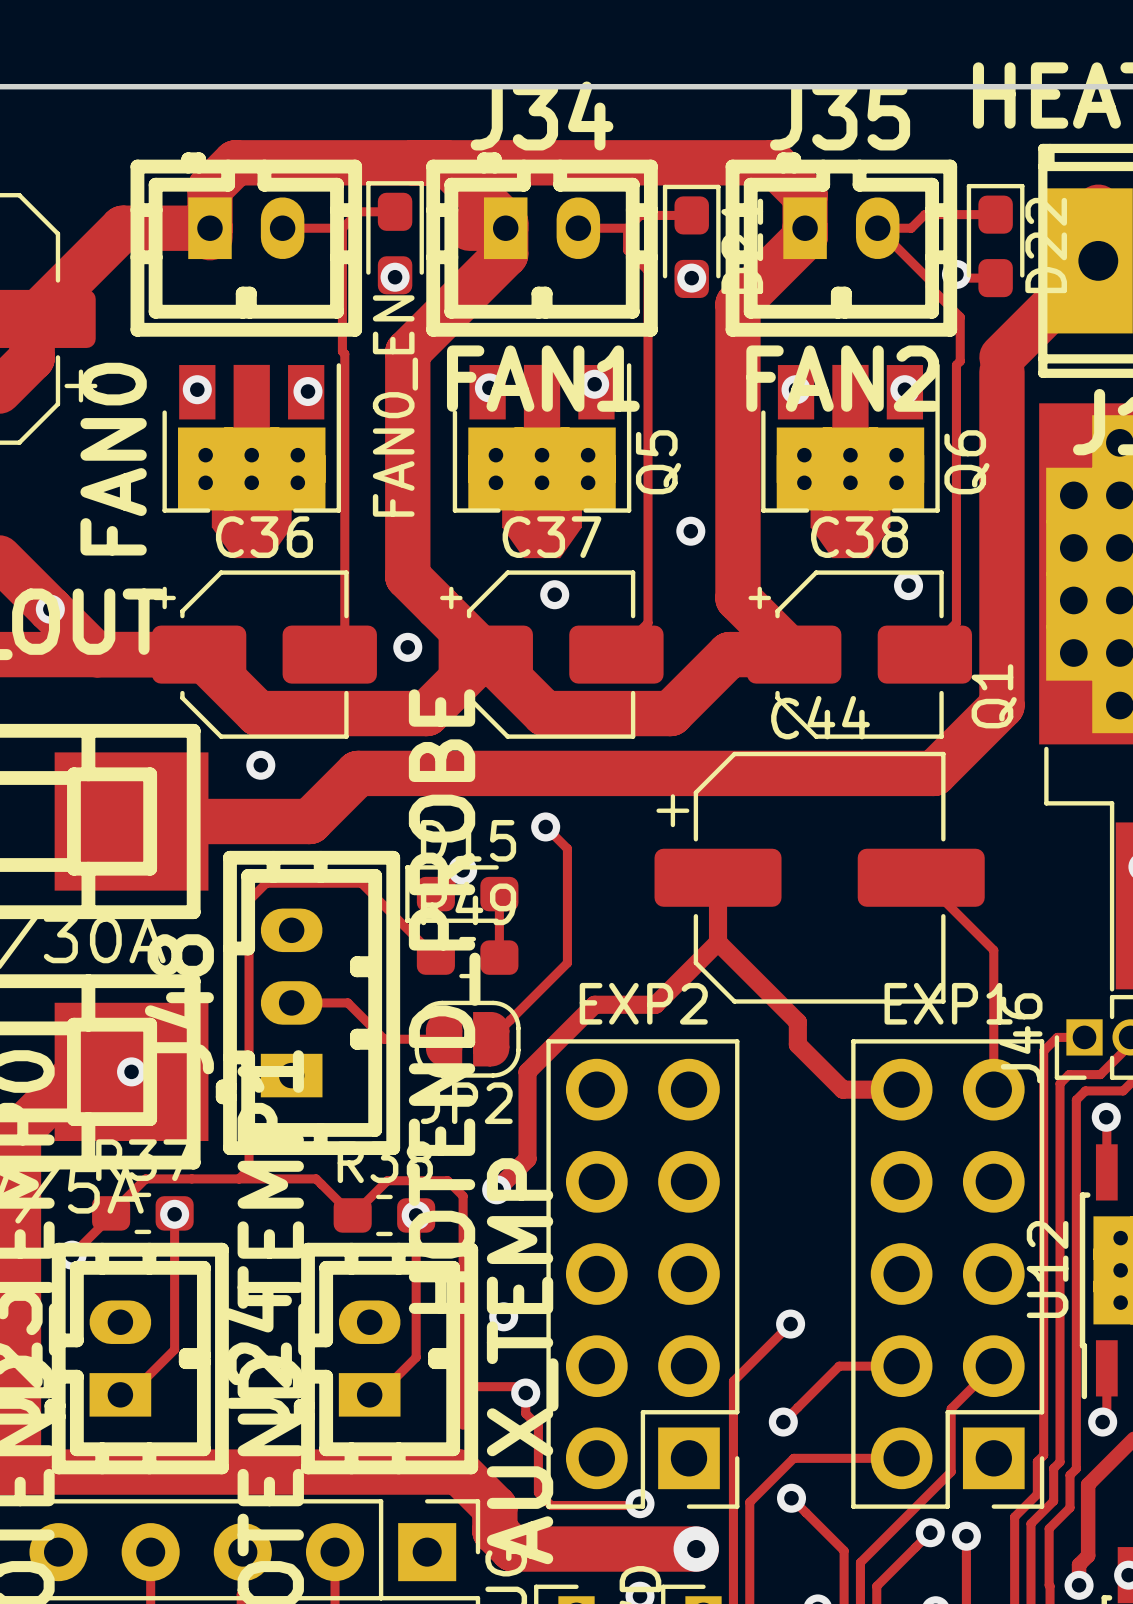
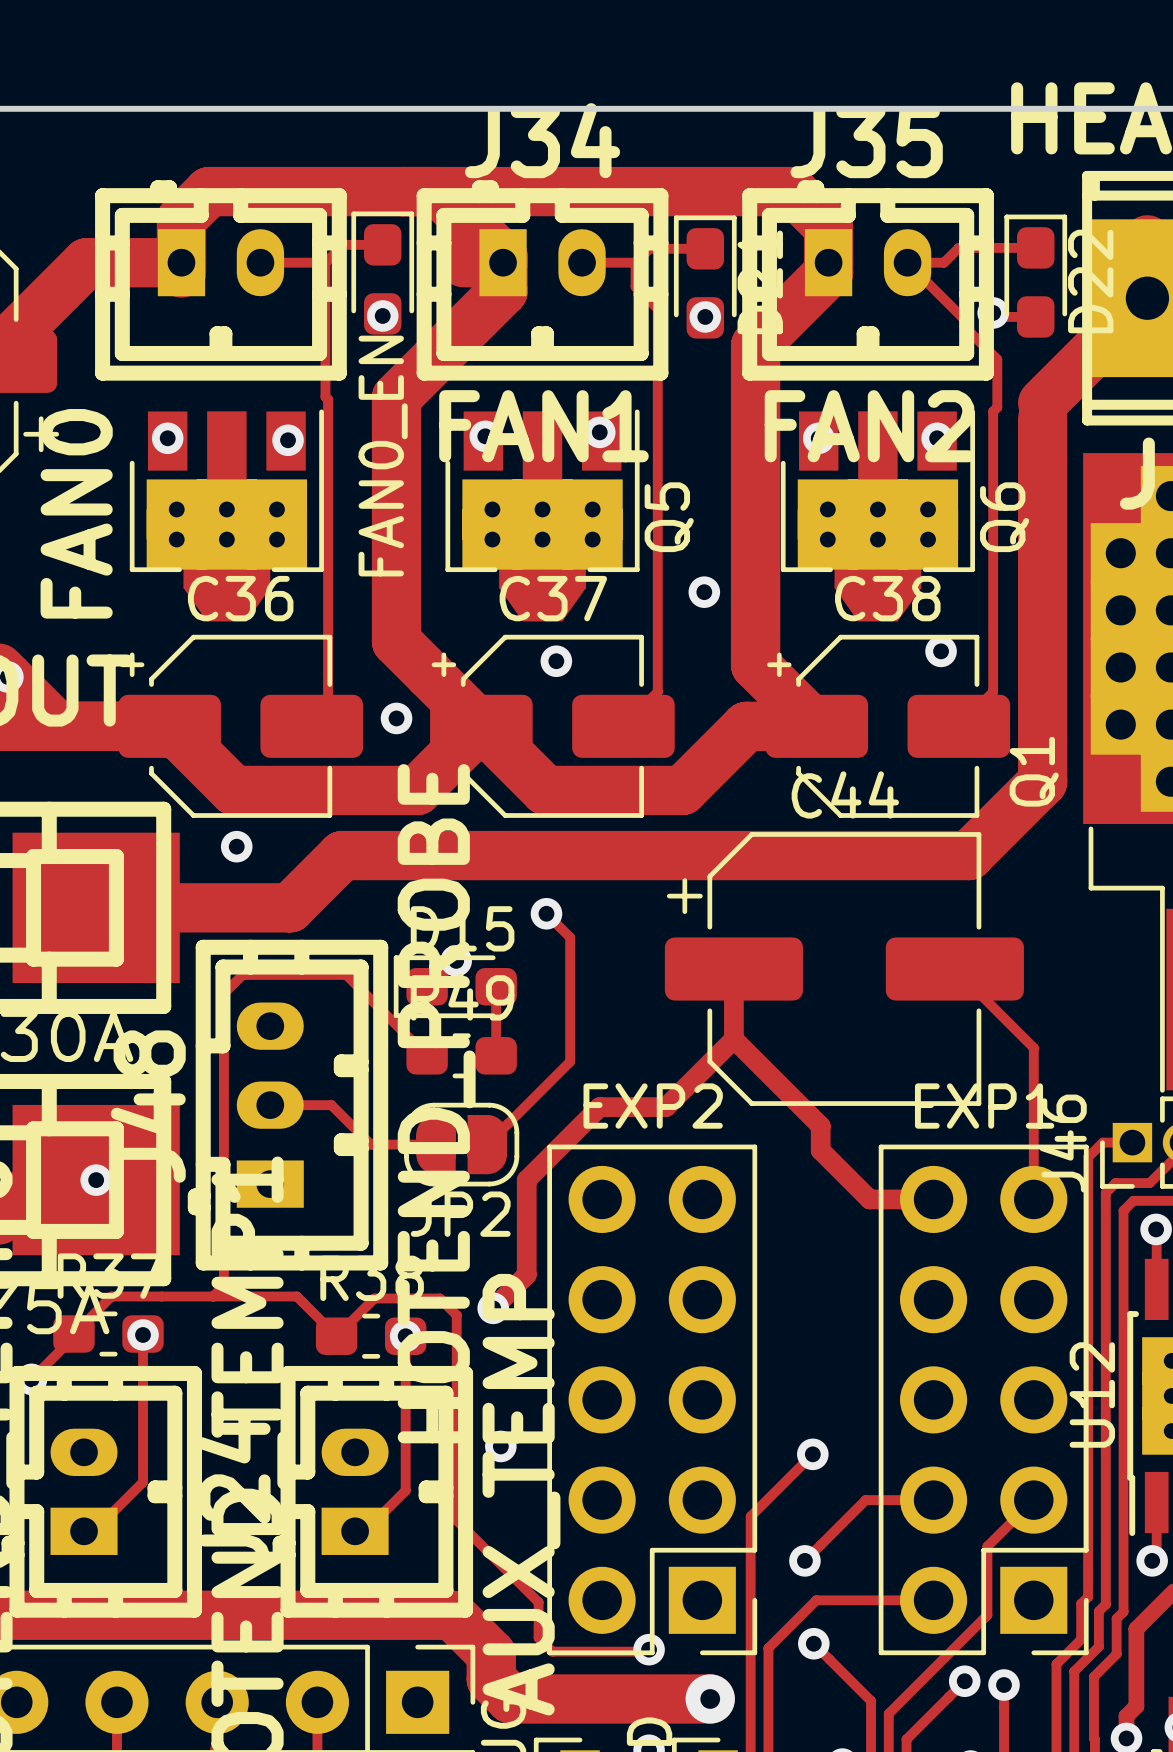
track: (463, 1384) (463, 1425) -> none
track: (463, 1386) (528, 1386) (525, 1393) (525, 1413) (538, 1426) (538, 1460) -> (456, 1520) (538, 1602)
via: (525, 1393) -> none

